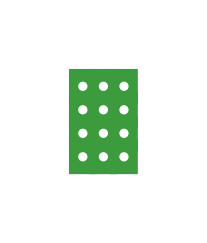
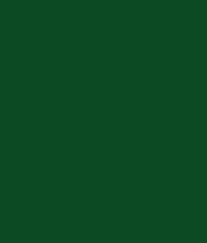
part: (103, 121) -> none

